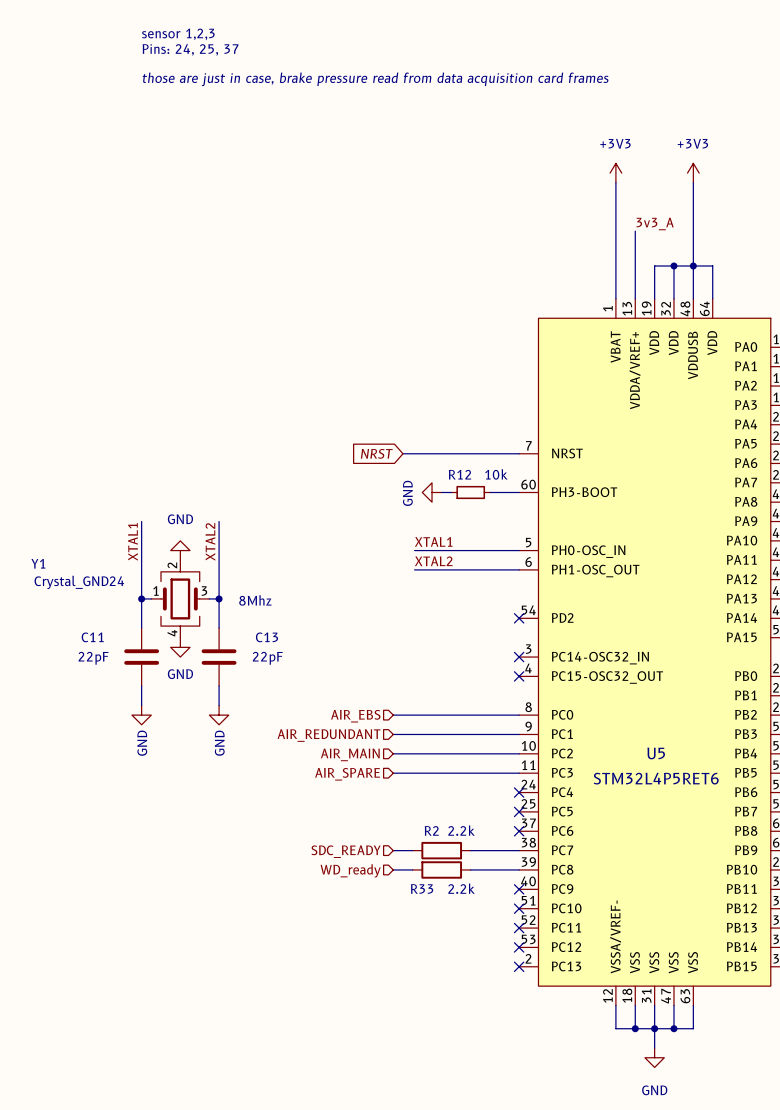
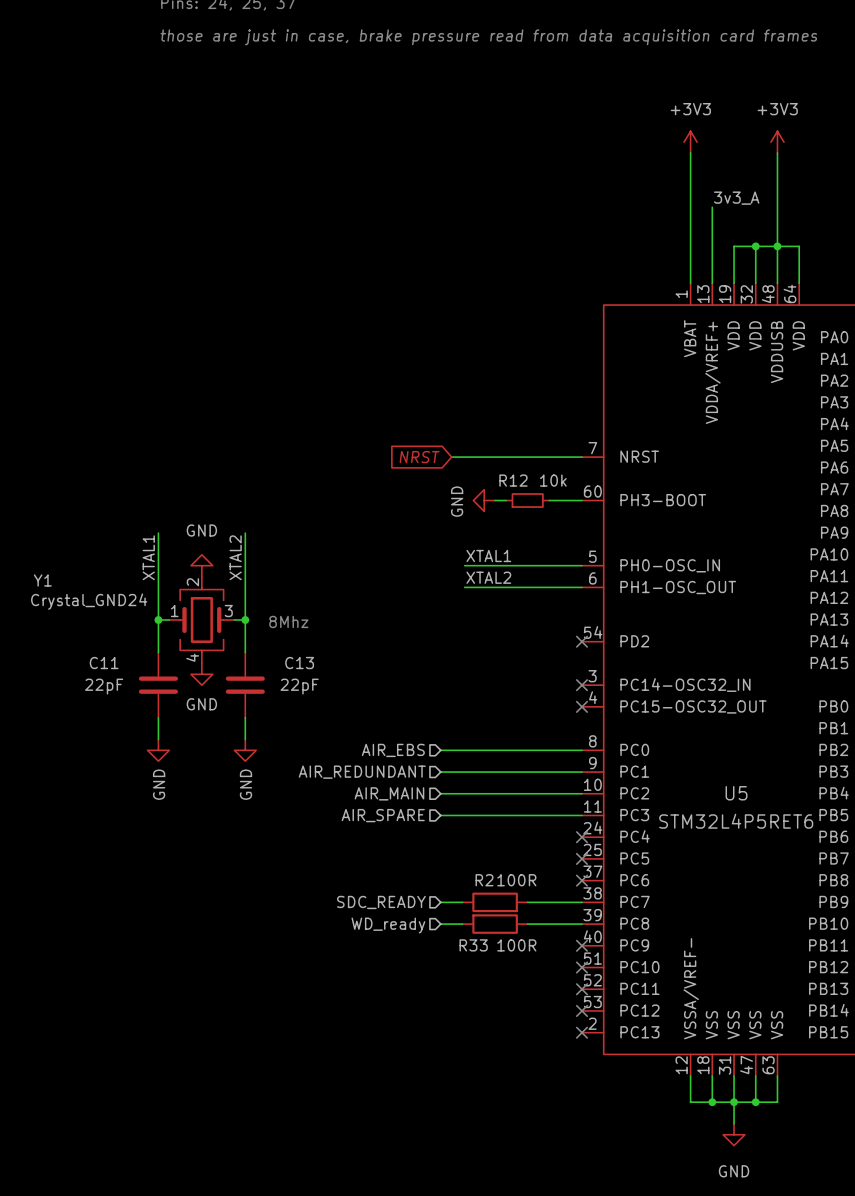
R2 value: 2.2k (461, 830) -> 100R (516, 880)
R33 value: 2.2k (461, 888) -> 100R (516, 945)

